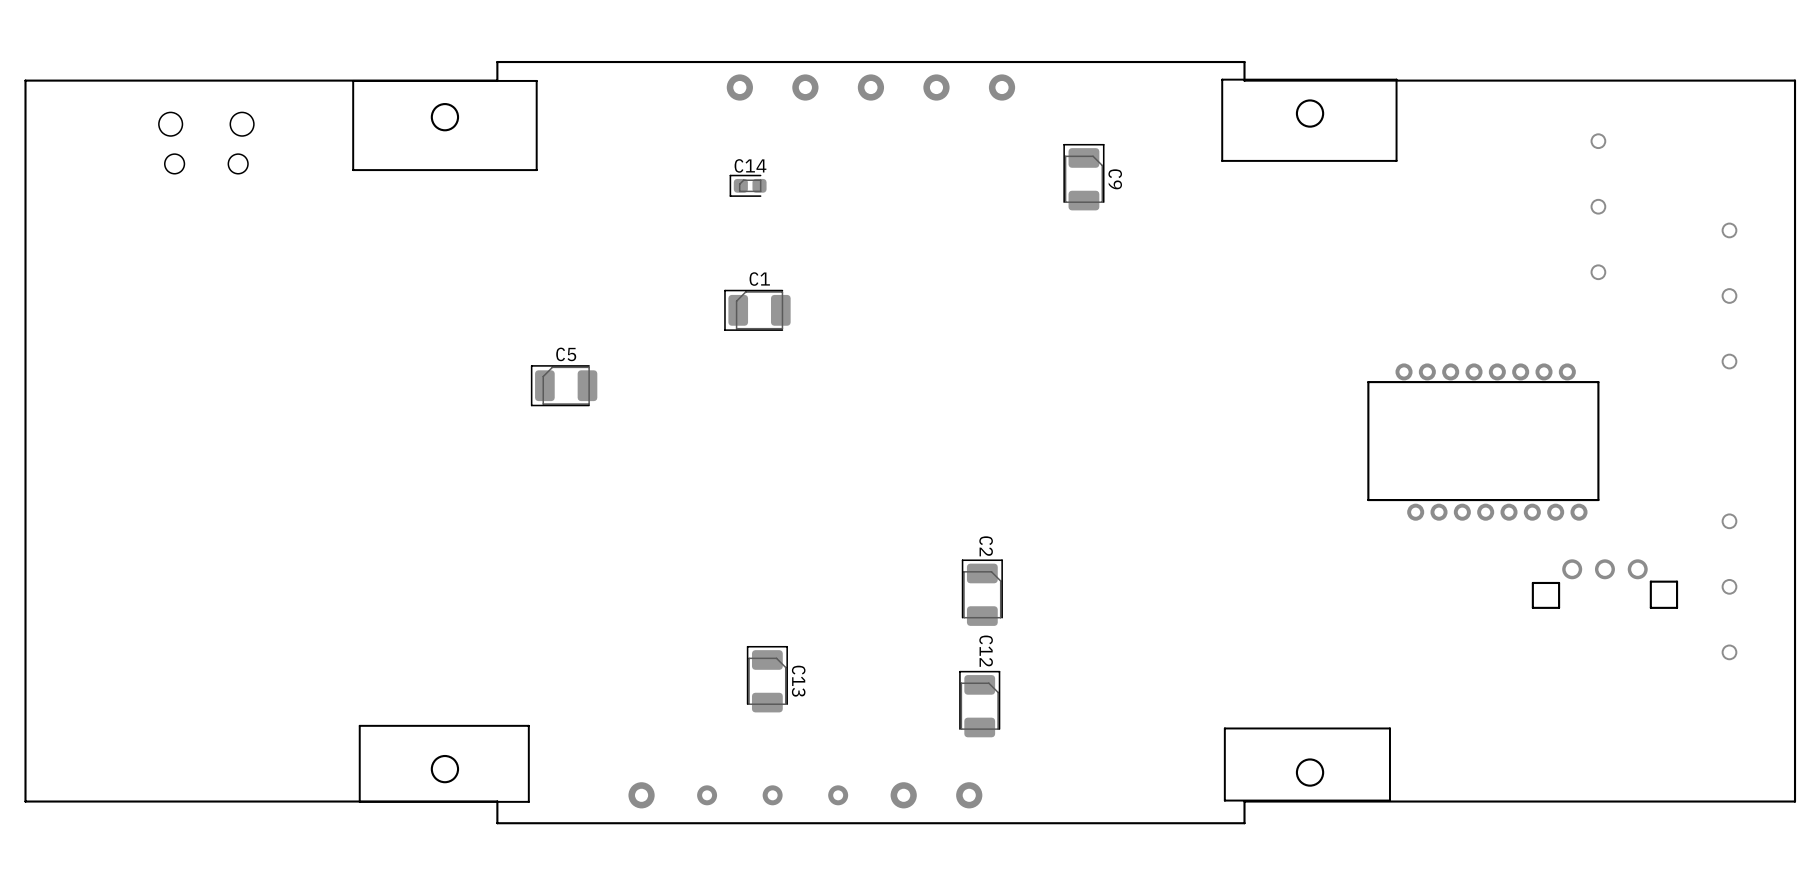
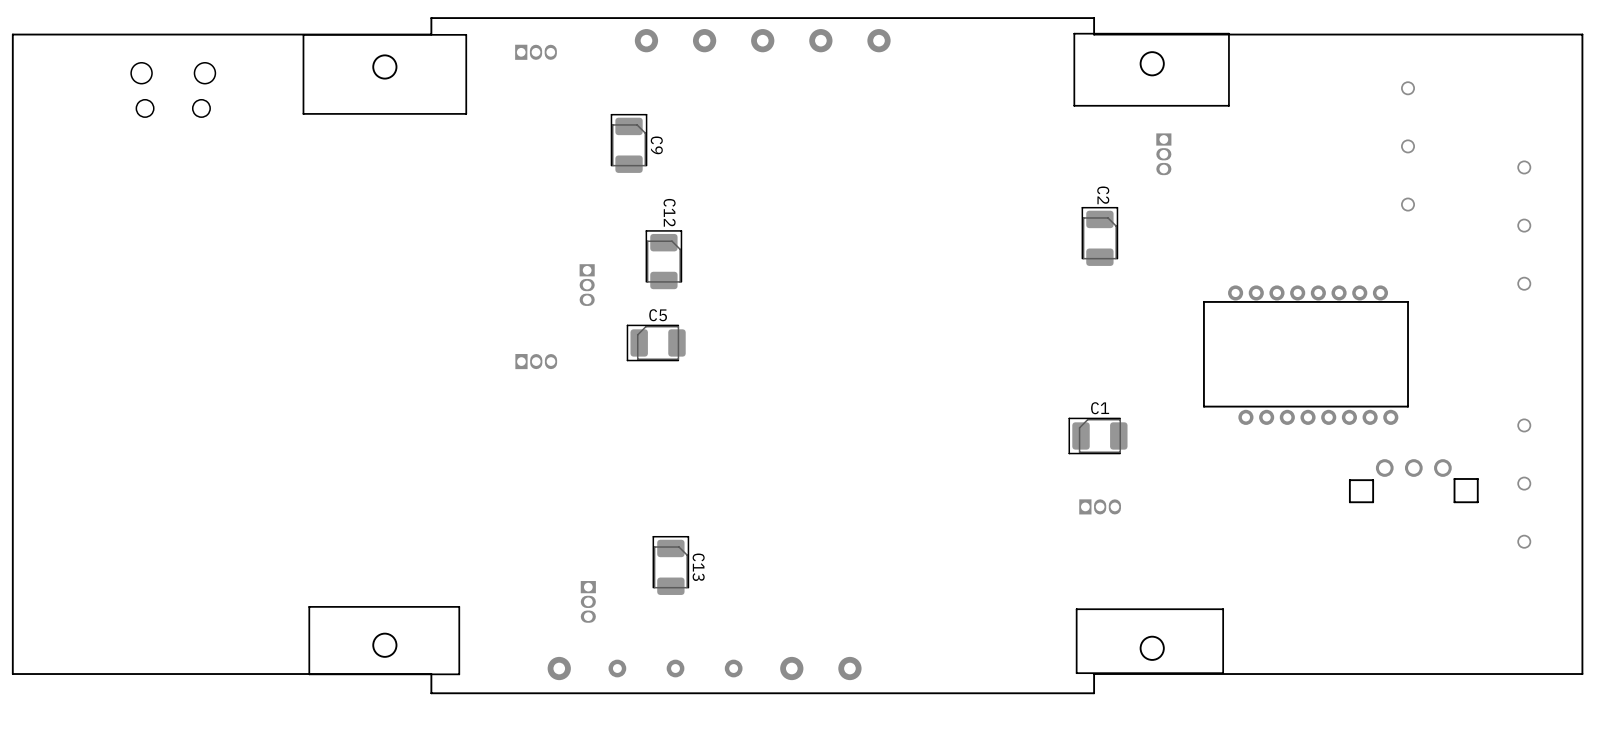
part: none -> (536, 52)
C9 position: (1083, 177) -> (629, 143)
C14: (748, 185) -> none
part: none -> (1163, 154)
C1 position: (757, 310) -> (1098, 435)
part: none -> (587, 285)
C5 position: (564, 385) -> (656, 342)
part: none -> (536, 361)
C2 position: (982, 592) -> (1099, 236)
part: none -> (1100, 506)
C12 position: (979, 704) -> (663, 259)
part: none -> (588, 601)

